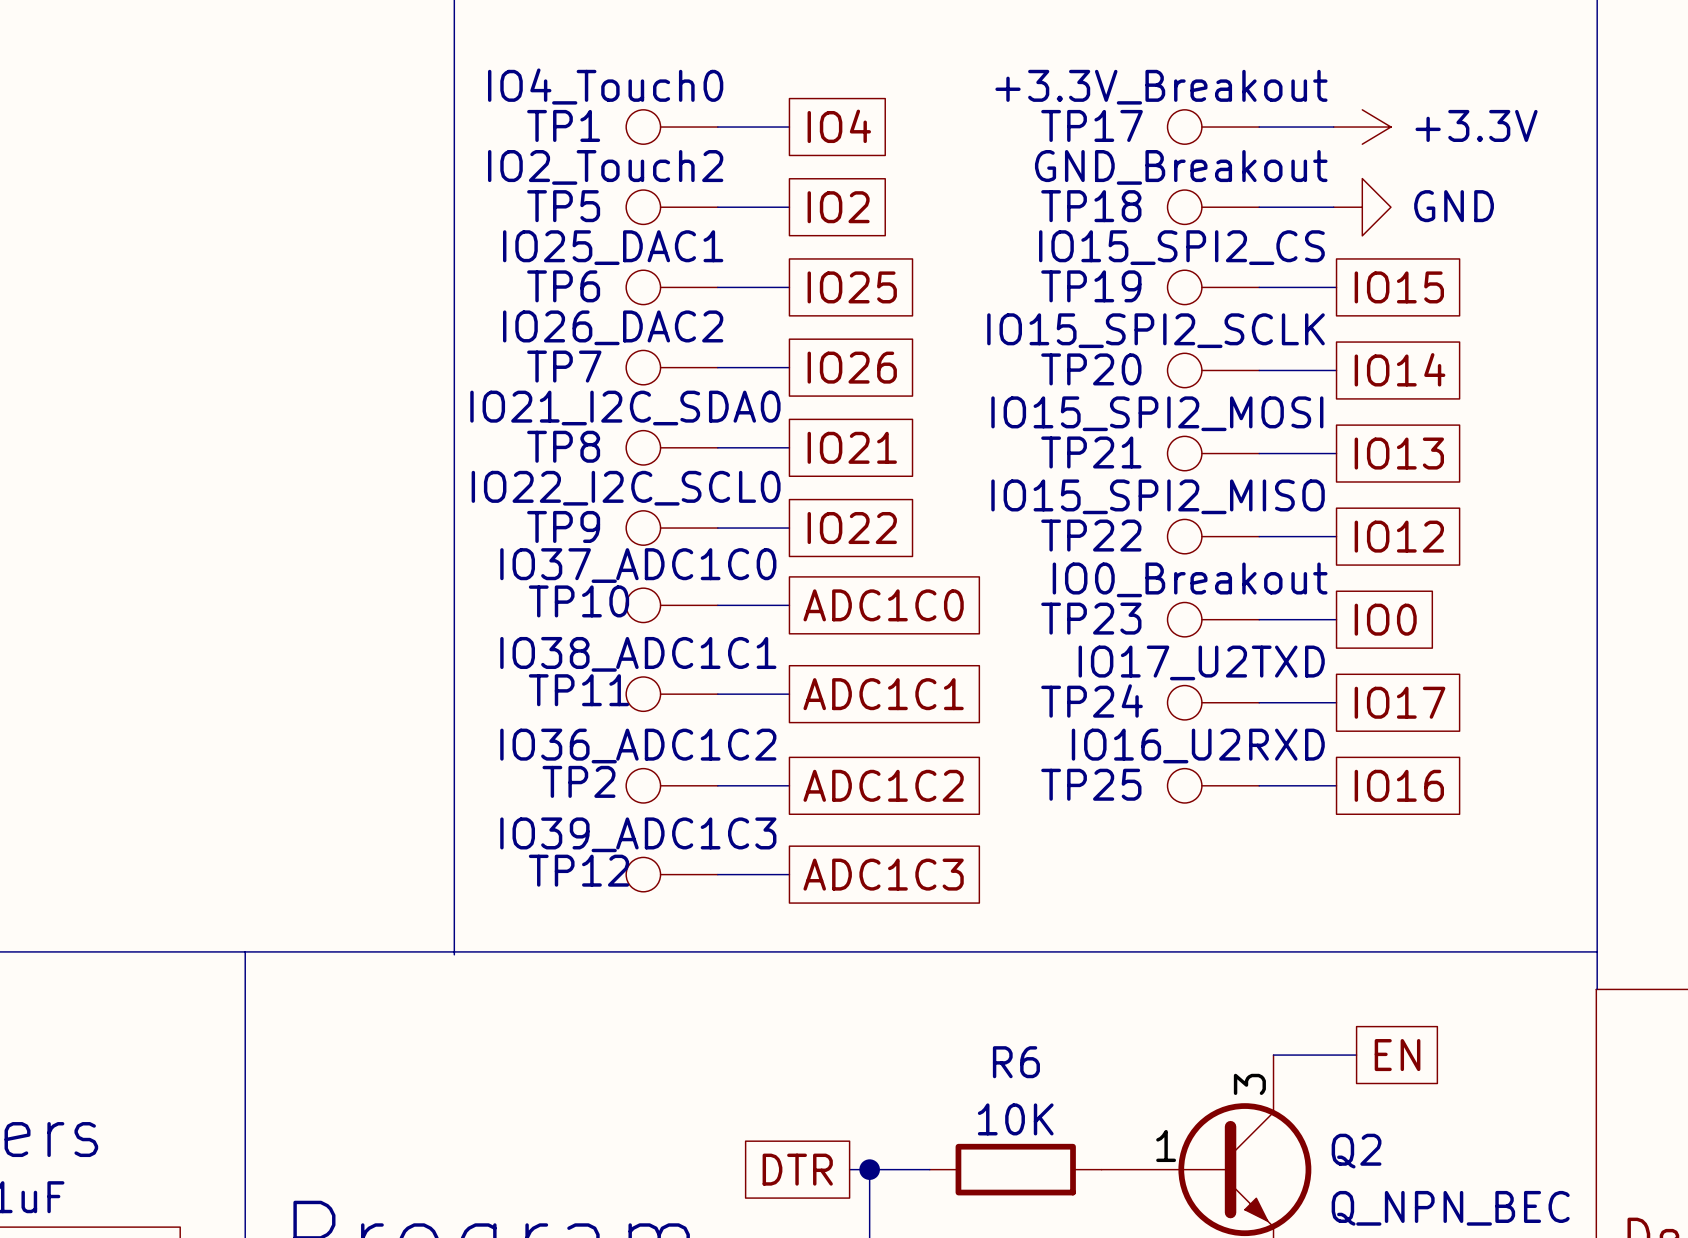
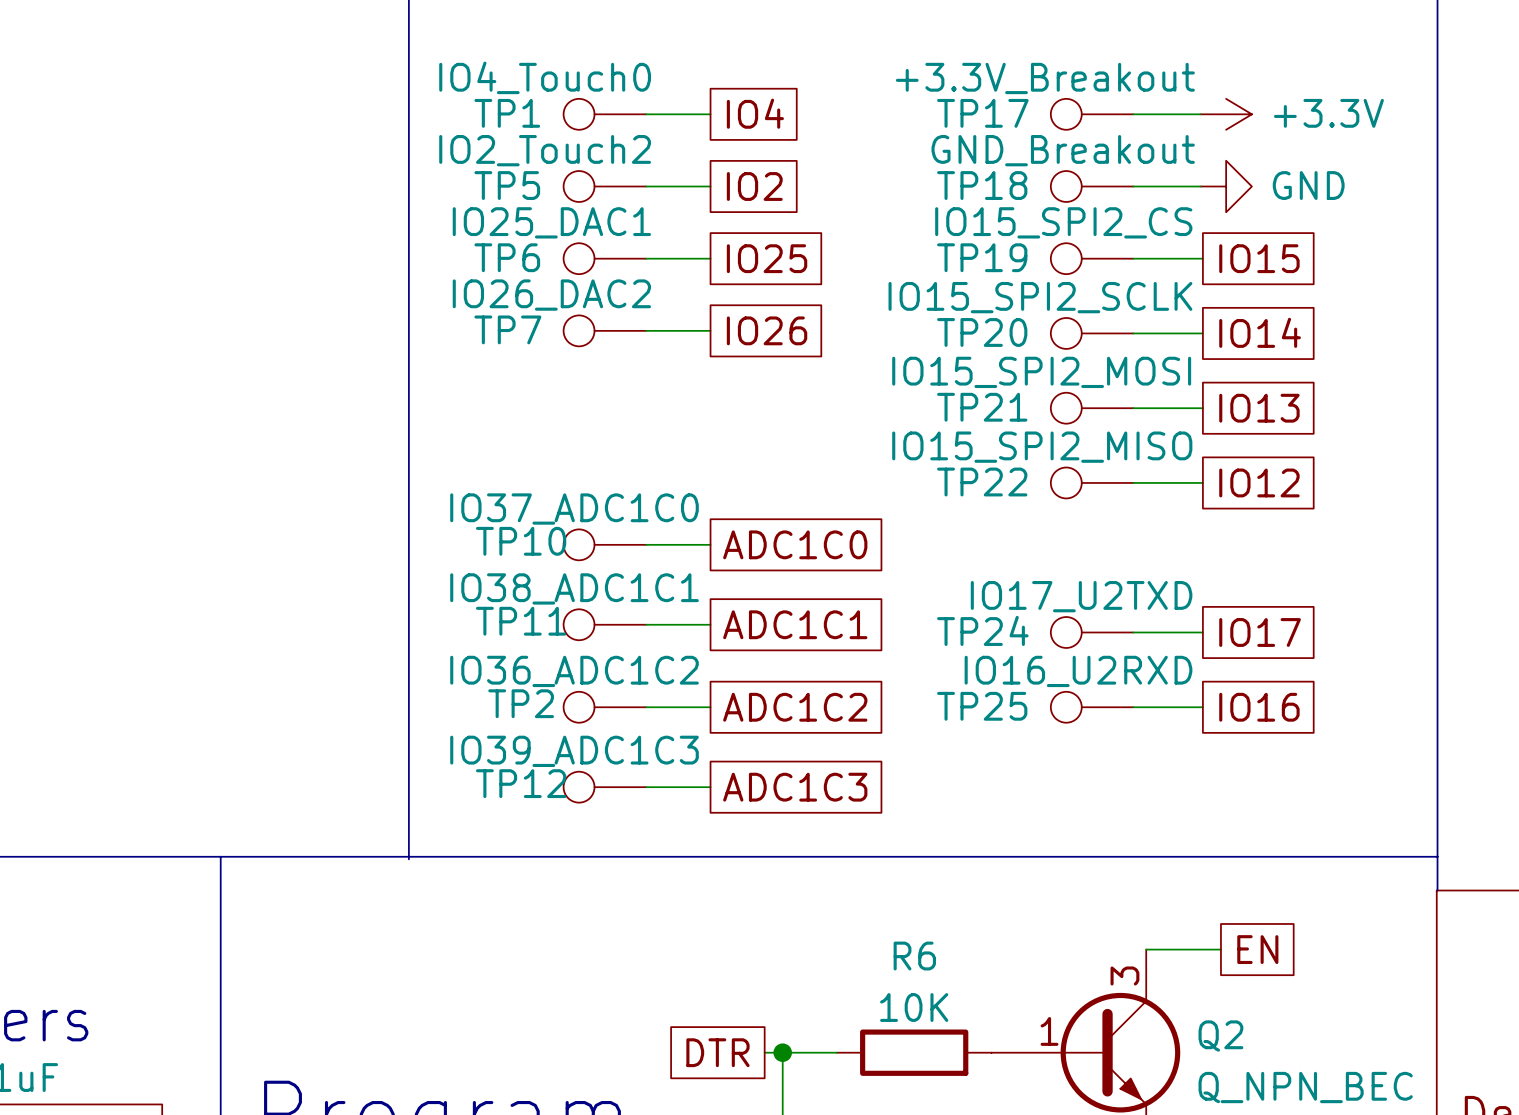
TP8: IO21_I2C_SDA0 (672, 447) -> none
wire: (717, 447) (789, 447) -> none
global label: IO21 (852, 447) -> none
TP9: IO22_I2C_SCL0 (672, 528) -> none
wire: (717, 528) (789, 528) -> none
global label: IO22 (852, 528) -> none
TP23: IO0_Breakout (1213, 619) -> none
wire: (1259, 619) (1336, 619) -> none
global label: IO0 (1385, 619) -> none

